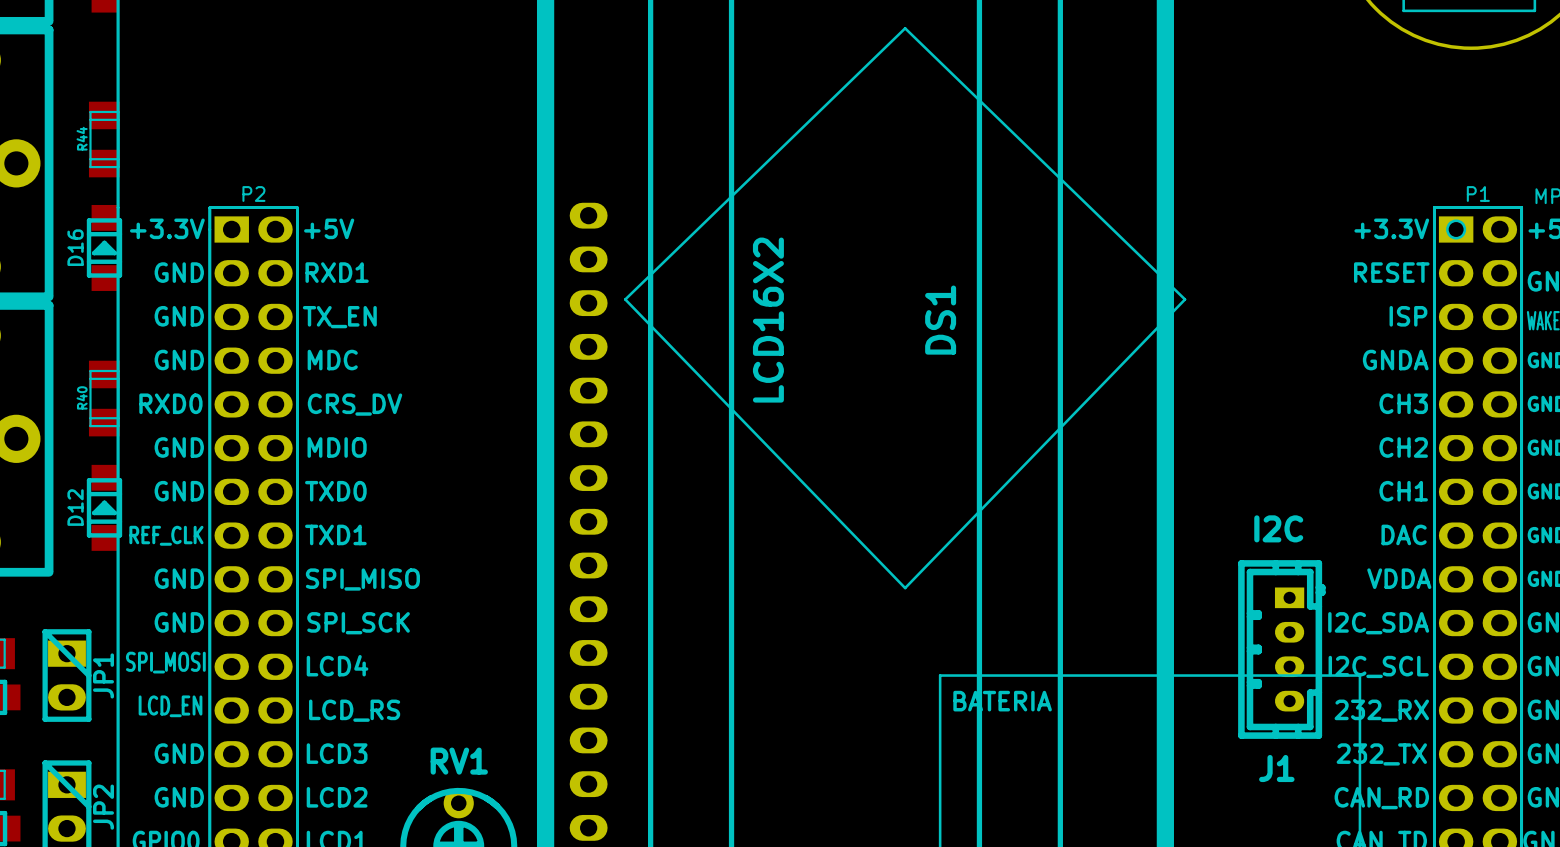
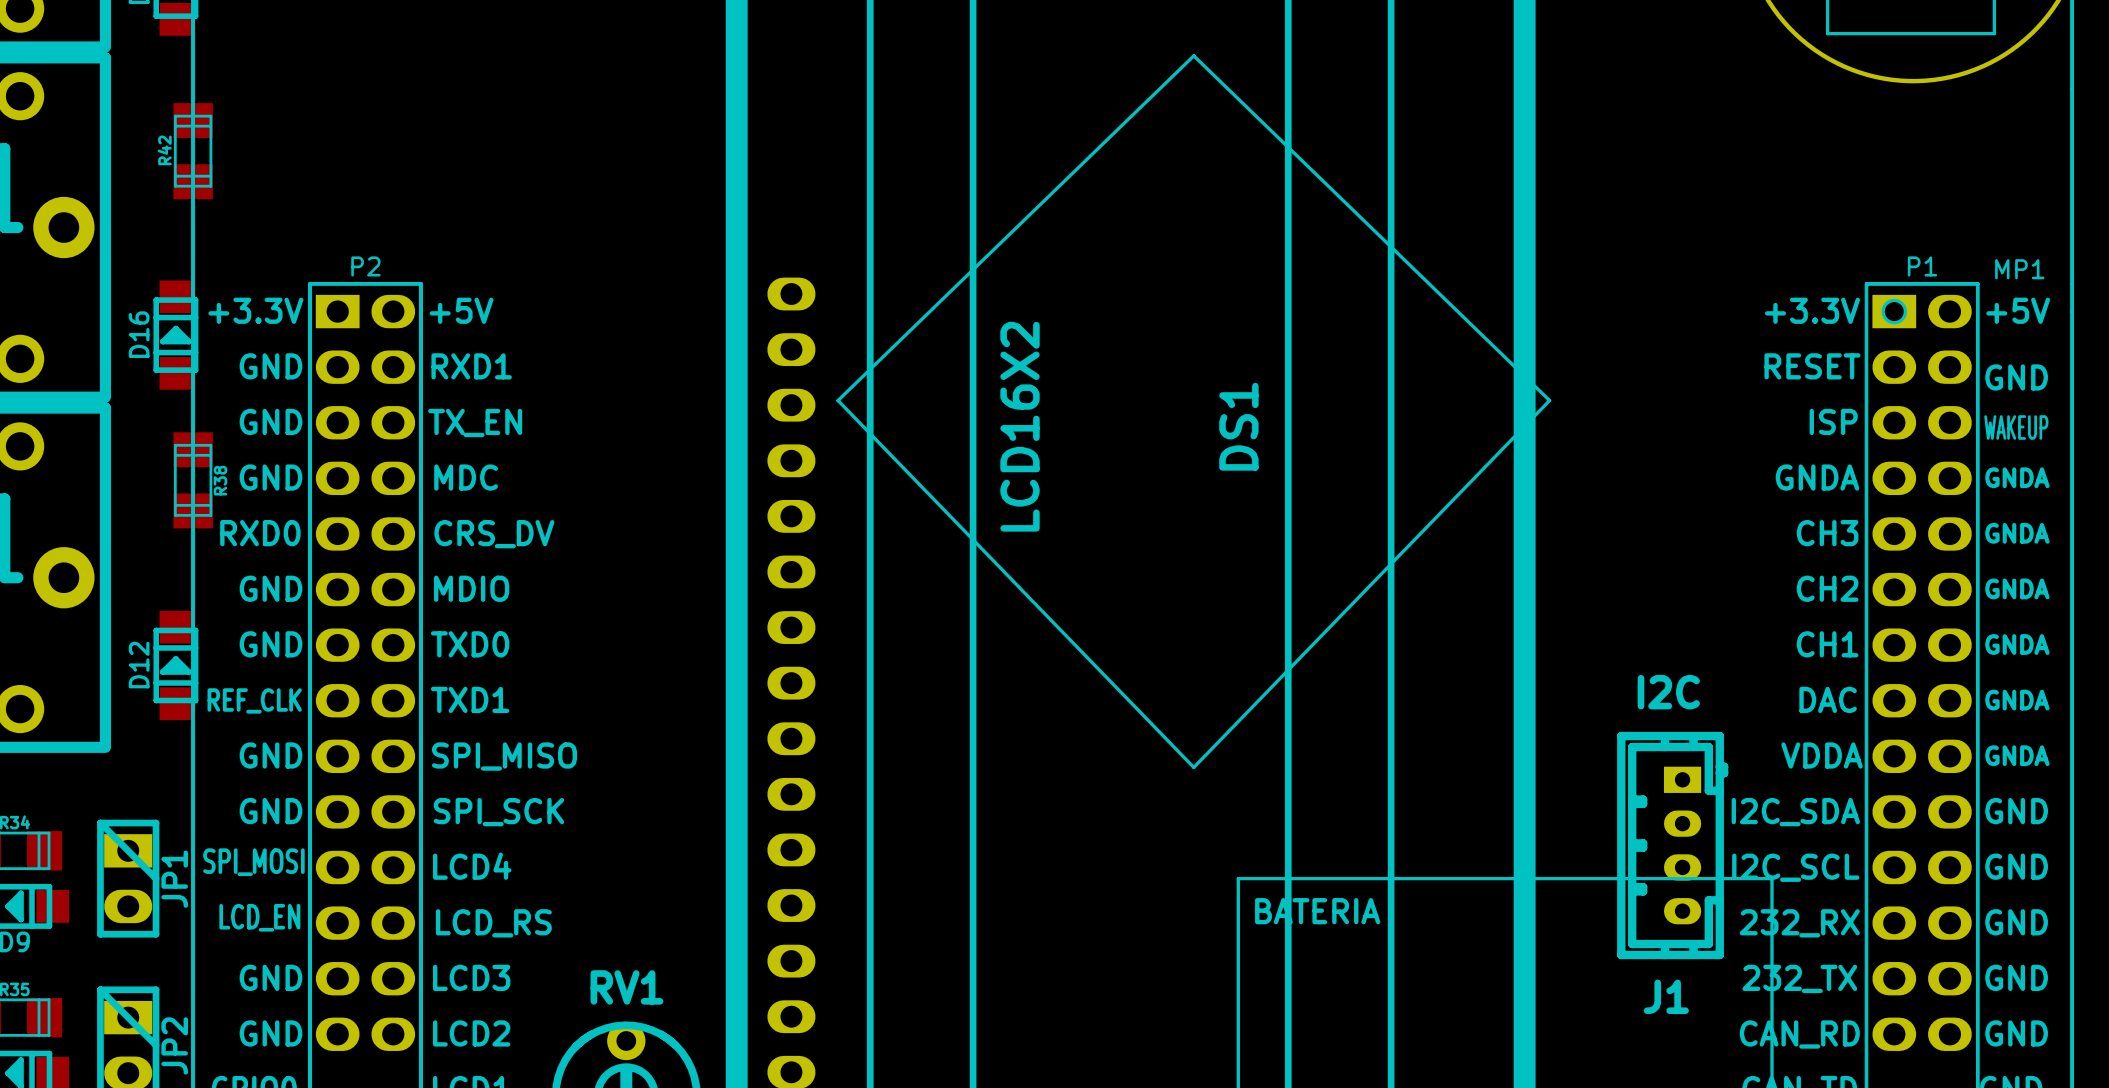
R42: none -> (193, 151)
R44: (104, 139) -> none
R38: none -> (193, 480)
R40: (104, 398) -> none

